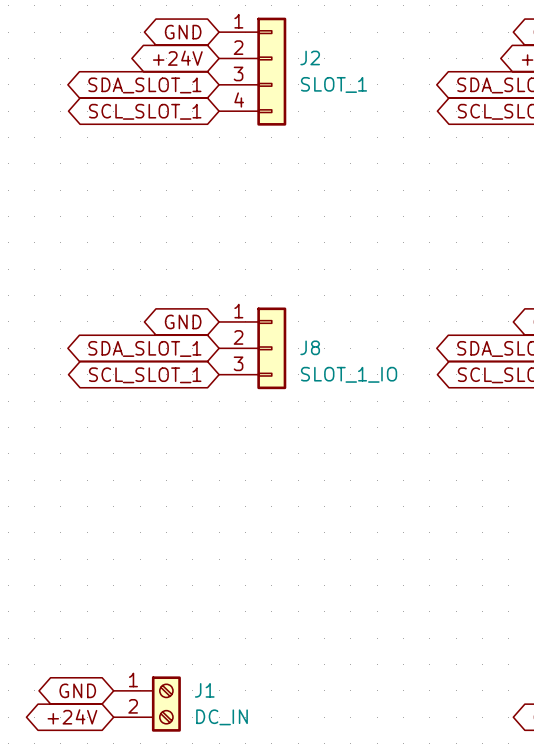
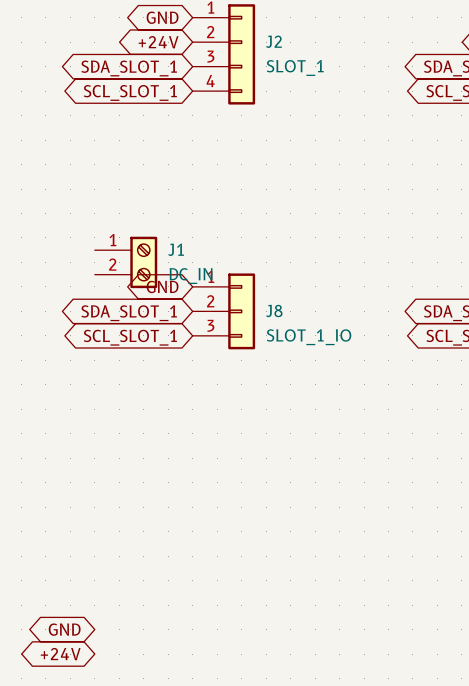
J1 position: (147, 704) -> (126, 262)

